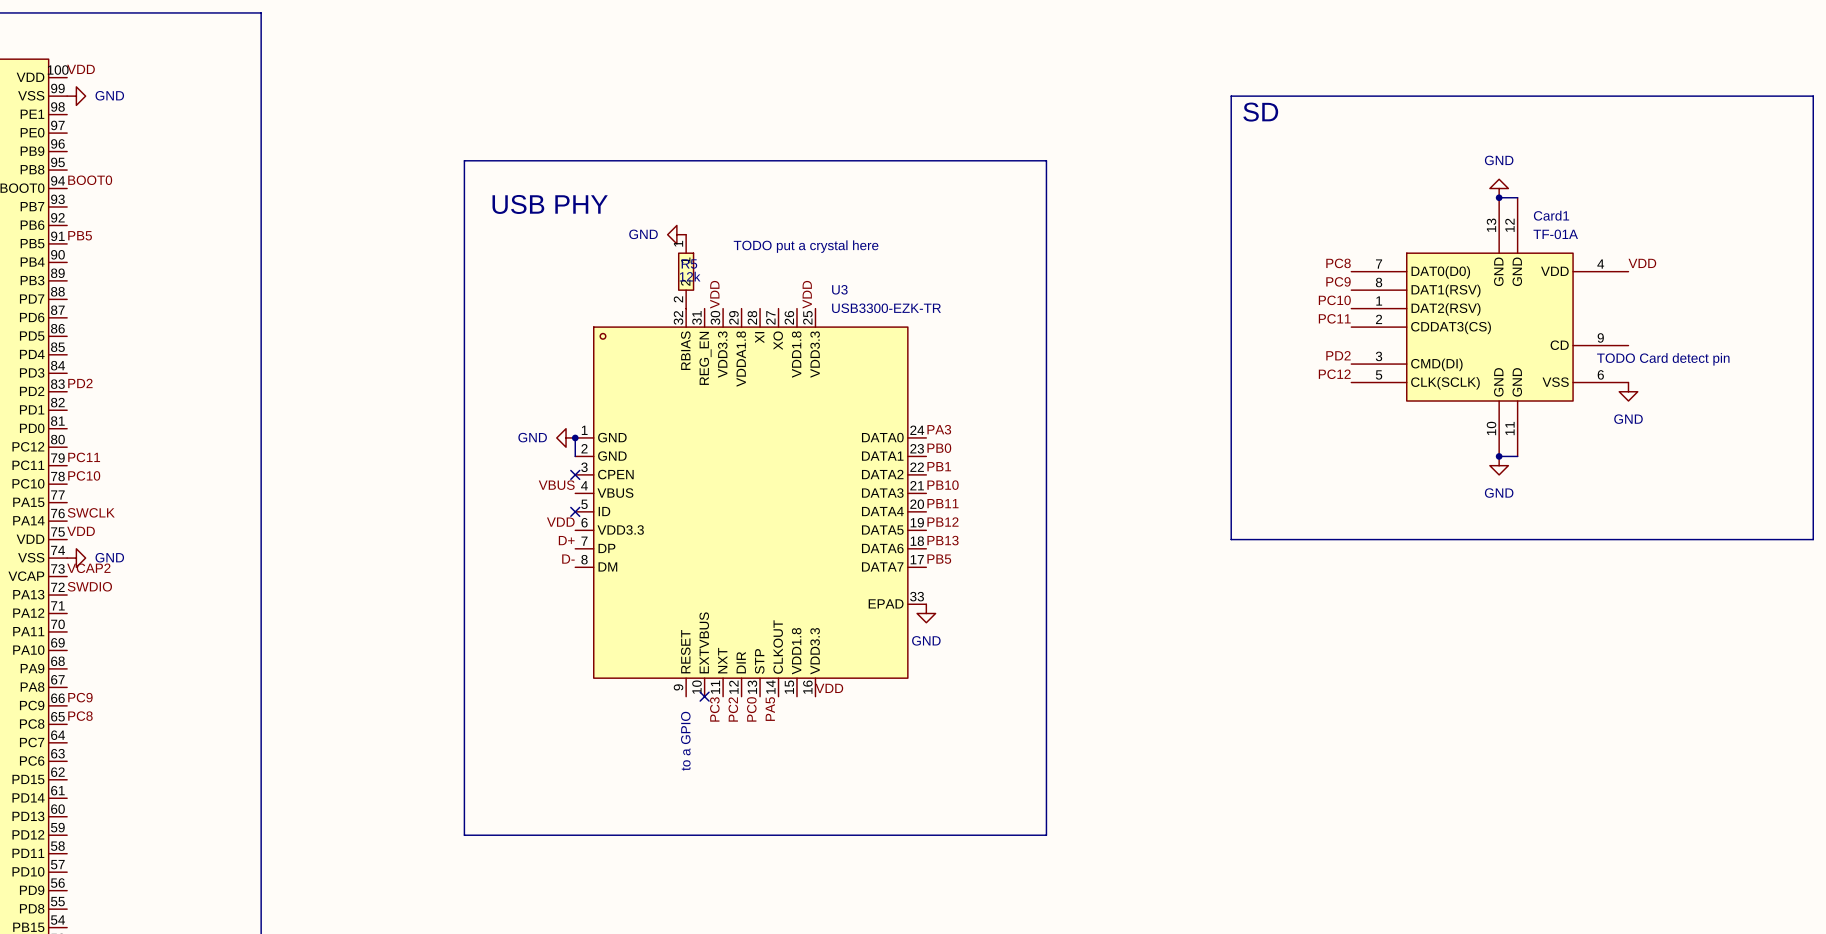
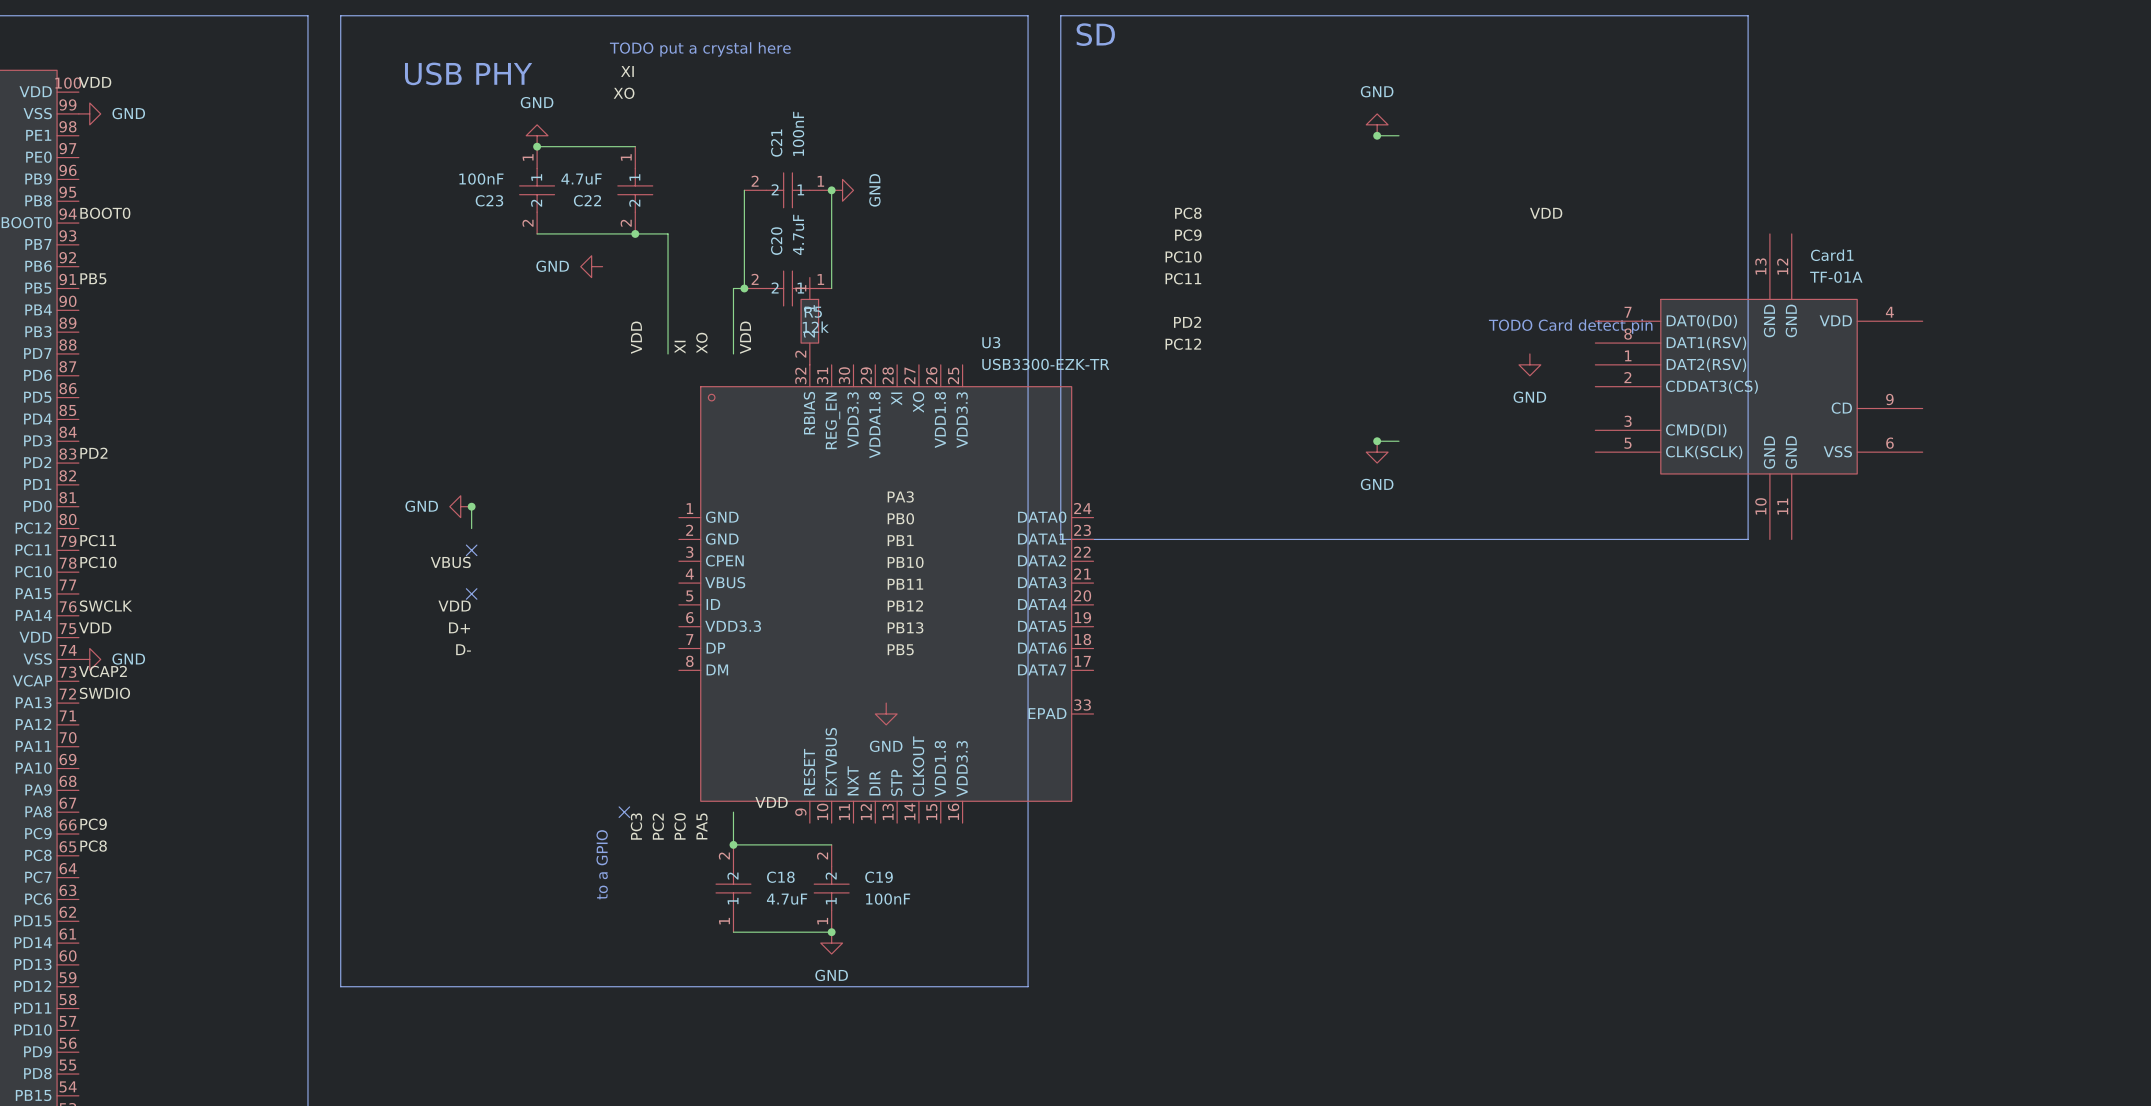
line: none -> (1060, 15) (1748, 15) (1748, 539) (1060, 539) (1060, 15)
text: none -> SD (1095, 34)
text: none -> TODO put a crystal here (700, 49)
label: none -> XI (627, 71)
text: none -> USB PHY (468, 73)
label: none -> XO (624, 93)
line: (1231, 96) (1813, 96) (1813, 539) (1231, 539) (1231, 96) -> none
power symbol: none -> GND (1377, 124)
text: SD (1260, 112) -> none
power symbol: none -> GND (537, 135)
wire: none -> (1377, 135) (1398, 135)
junction: none -> (1377, 135)
wire: none -> (537, 146) (635, 146)
junction: none -> (537, 146)
C23: none -> 100nF (537, 190)
C22: none -> 4.7uF (635, 190)
wire: none -> (744, 190) (744, 288) (733, 288) (733, 353)
C21: none -> 100nF (788, 190)
wire: none -> (831, 190) (831, 288)
junction: none -> (831, 190)
label: none -> PC8 (1188, 213)
label: none -> VDD (1546, 213)
power symbol: GND (1499, 188) -> none
wire: none -> (537, 233) (668, 233) (668, 353)
junction: none -> (635, 233)
wire: (1499, 197) (1517, 197) -> none
junction: (1499, 197) -> none
label: none -> PC9 (1188, 235)
text: USB PHY (550, 204) -> none
label: none -> PC10 (1183, 256)
power symbol: none -> GND (591, 266)
power symbol rotation: 0° (676, 234) -> 180° (842, 190)
power symbol position: GND (676, 234) -> GND (842, 190)
label: none -> PC11 (1183, 278)
junction: none -> (744, 288)
C20: none -> 4.7uF (788, 288)
text: TODO put a crystal here (806, 246) -> none
label: PC8 (1338, 263) -> none
label: VDD (1642, 263) -> none
label: none -> PD2 (1187, 322)
text: none -> TODO Card detect pin (1570, 326)
label: PC9 (1338, 281) -> none
label: none -> VDD (636, 337)
label: none -> XO (701, 343)
label: none -> PC12 (1183, 344)
label: none -> XI (680, 347)
label position: VDD (714, 294) -> VDD (745, 337)
label: VDD (807, 294) -> none
label: PC10 (1334, 300) -> none
power symbol: none -> GND (1529, 364)
label: PC11 (1334, 318) -> none
label: PD2 (1338, 355) -> none
text: TODO Card detect pin (1663, 359) -> none
wire: none -> (1377, 441) (1398, 441)
junction: none -> (1377, 441)
label: PC12 (1334, 374) -> none
power symbol: none -> GND (1377, 452)
power symbol: GND (1628, 391) -> none
power symbol: none -> GND (460, 506)
junction: none -> (471, 506)
label position: PA3 (939, 429) -> PA3 (900, 496)
power symbol: GND (566, 437) -> none
wire: (575, 437) (575, 456) -> (471, 506) (471, 528)
junction: (575, 437) -> none
label position: PB0 (939, 448) -> PB0 (900, 518)
wire: (1499, 456) (1517, 456) -> none
junction: (1499, 456) -> none
no-connect mark: none -> (471, 550)
power symbol: GND (1499, 465) -> none
label position: PB1 (939, 466) -> PB1 (900, 540)
no-connect mark: (575, 474) -> none
label position: VBUS (556, 485) -> VBUS (450, 562)
label position: PB10 (943, 485) -> PB10 (905, 562)
no-connect mark: none -> (471, 593)
label position: PB11 (942, 503) -> PB11 (905, 584)
no-connect mark: (575, 511) -> none
label: none -> VDD (454, 606)
label: VDD (560, 522) -> none
label position: PB12 (942, 522) -> PB12 (905, 605)
label position: D+ (566, 540) -> D+ (459, 627)
label position: PB13 (943, 540) -> PB13 (905, 627)
label position: D- (568, 559) -> D- (463, 649)
label position: PB5 (939, 559) -> PB5 (900, 649)
power symbol: none -> GND (886, 713)
power symbol: GND (926, 613) -> none
label: none -> VDD (771, 802)
no-connect mark: none -> (624, 812)
wire: none -> (733, 812) (733, 844) (831, 844)
label: VDD (829, 688) -> none
no-connect mark: (704, 696) -> none
label position: PC3 (714, 709) -> PC3 (636, 826)
label position: PC2 (733, 709) -> PC2 (658, 826)
label position: PC0 (751, 709) -> PC0 (680, 826)
label position: PA5 (770, 709) -> PA5 (702, 826)
junction: none -> (733, 844)
text position: to a GPIO (685, 741) -> to a GPIO (602, 864)
C18: none -> 4.7uF (733, 888)
C19: none -> 100nF (831, 888)
wire: none -> (733, 932) (831, 932)
junction: none -> (831, 932)
power symbol: none -> GND (831, 943)
line: (464, 835) (464, 160) (1046, 160) (1046, 835) (870, 835) -> (548, 986) (340, 986) (340, 15) (1028, 15) (1028, 986)

